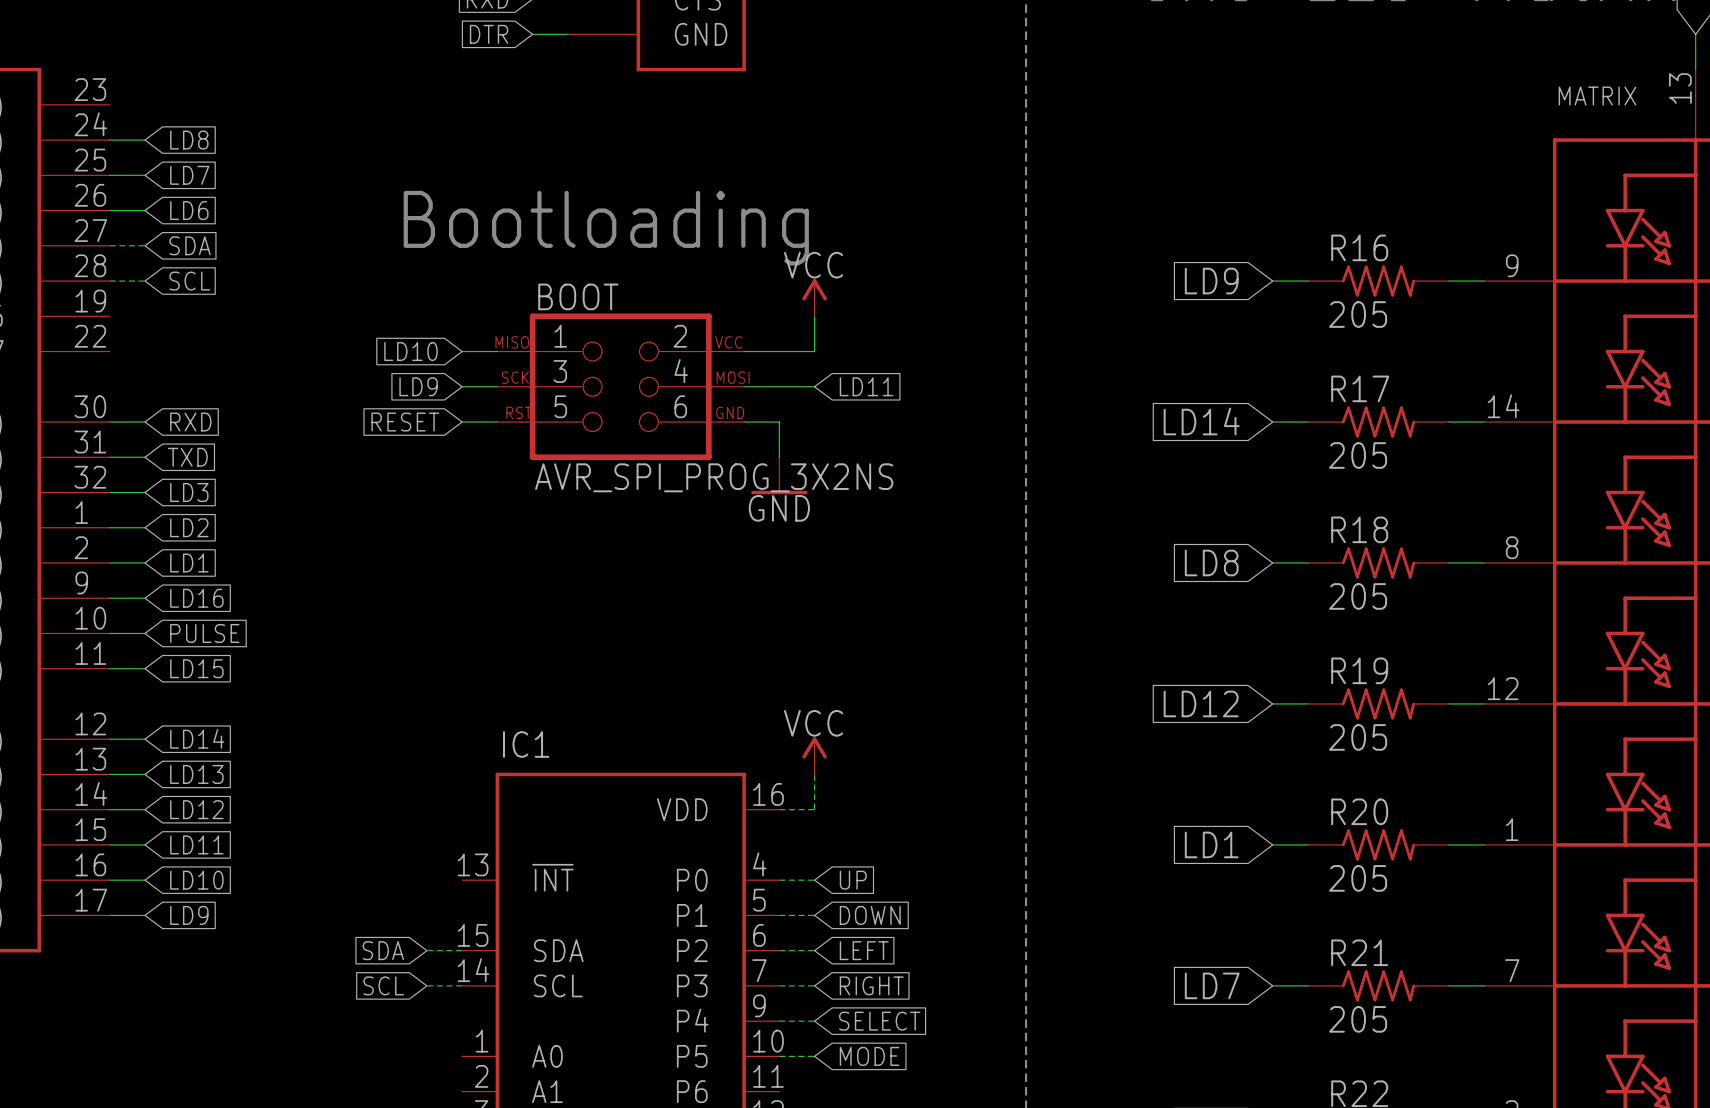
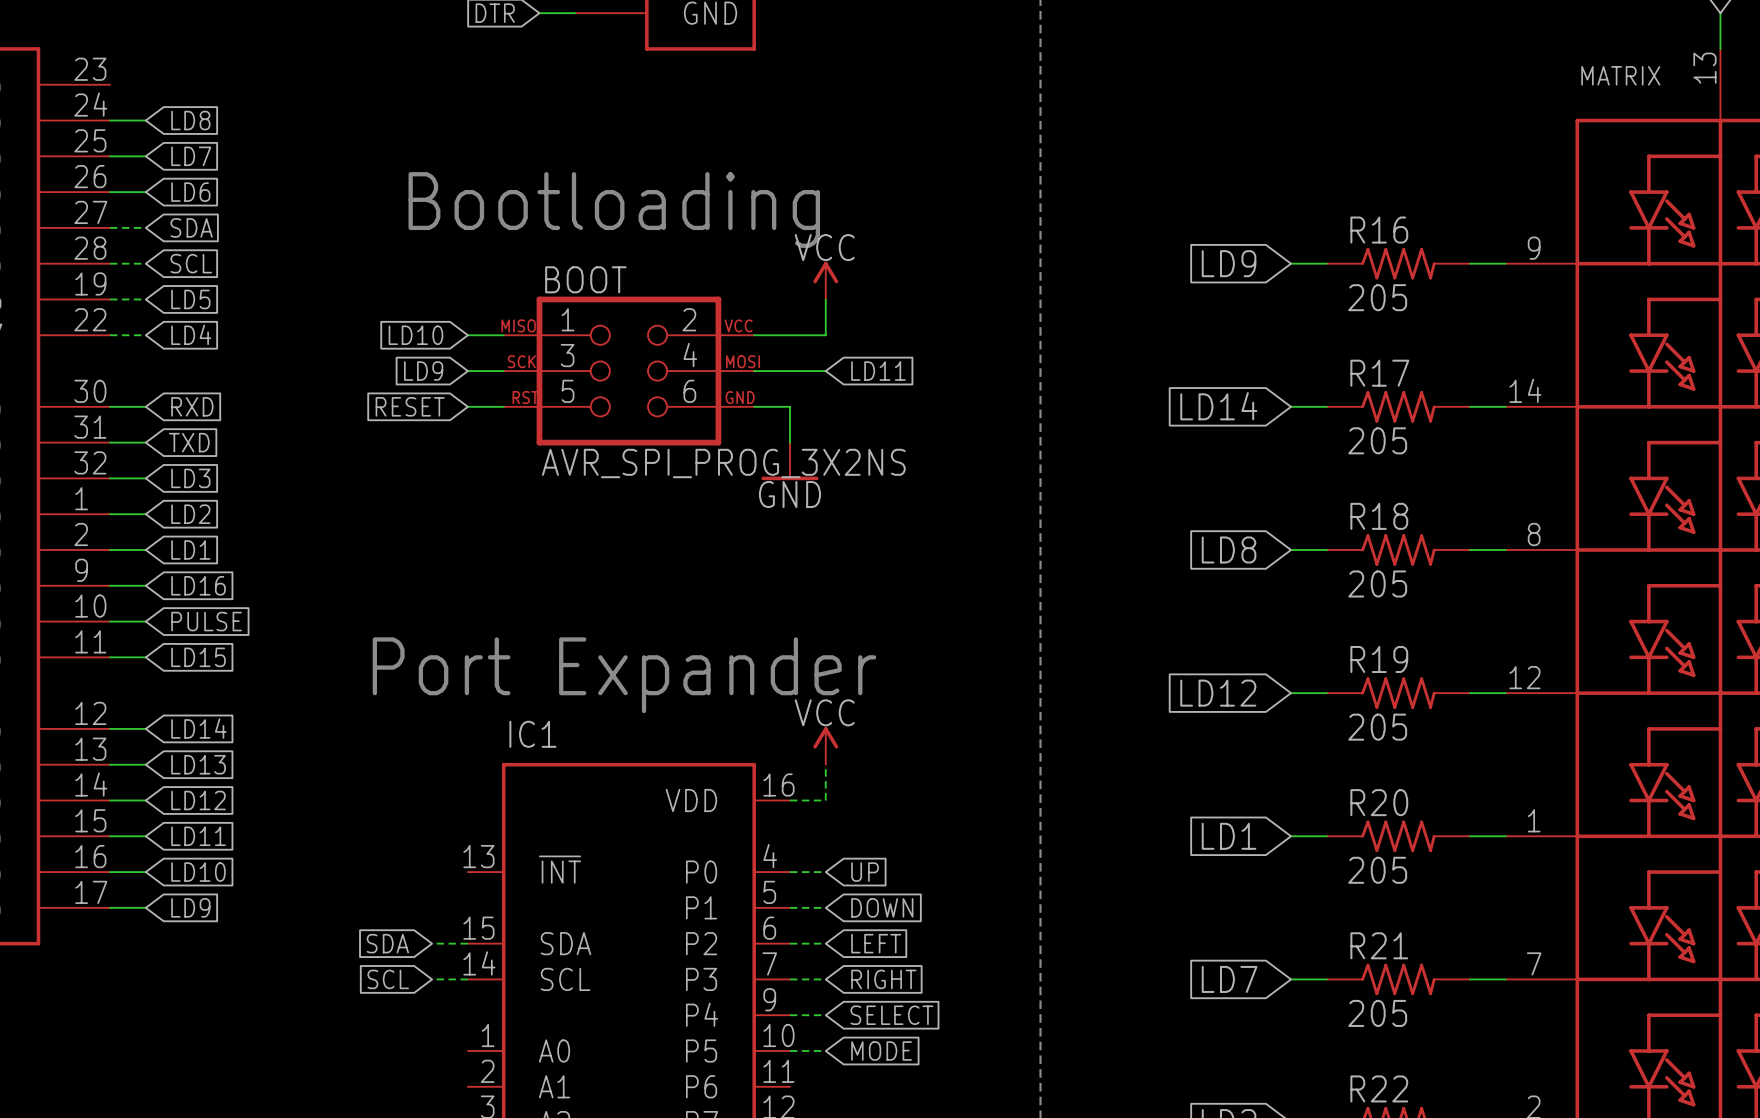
wire: none -> (110, 299) (145, 299)
global label: none -> LD5 (190, 299)
wire: none -> (110, 335) (145, 335)
global label: none -> LD4 (191, 334)
text: none -> Port Expander (624, 675)

